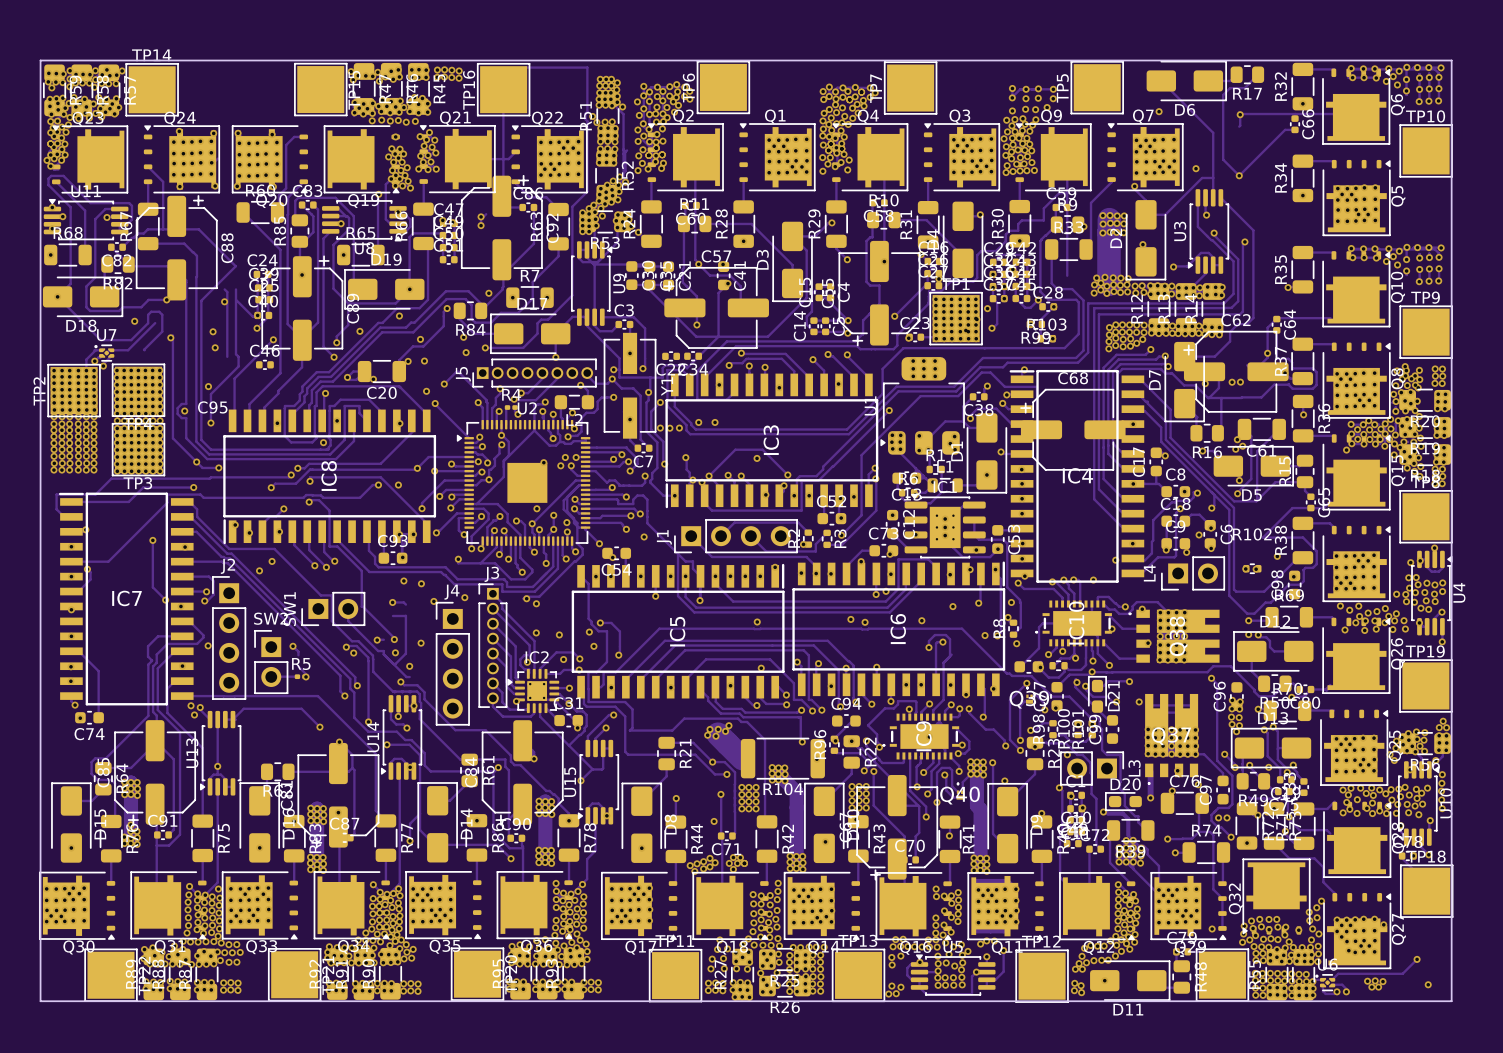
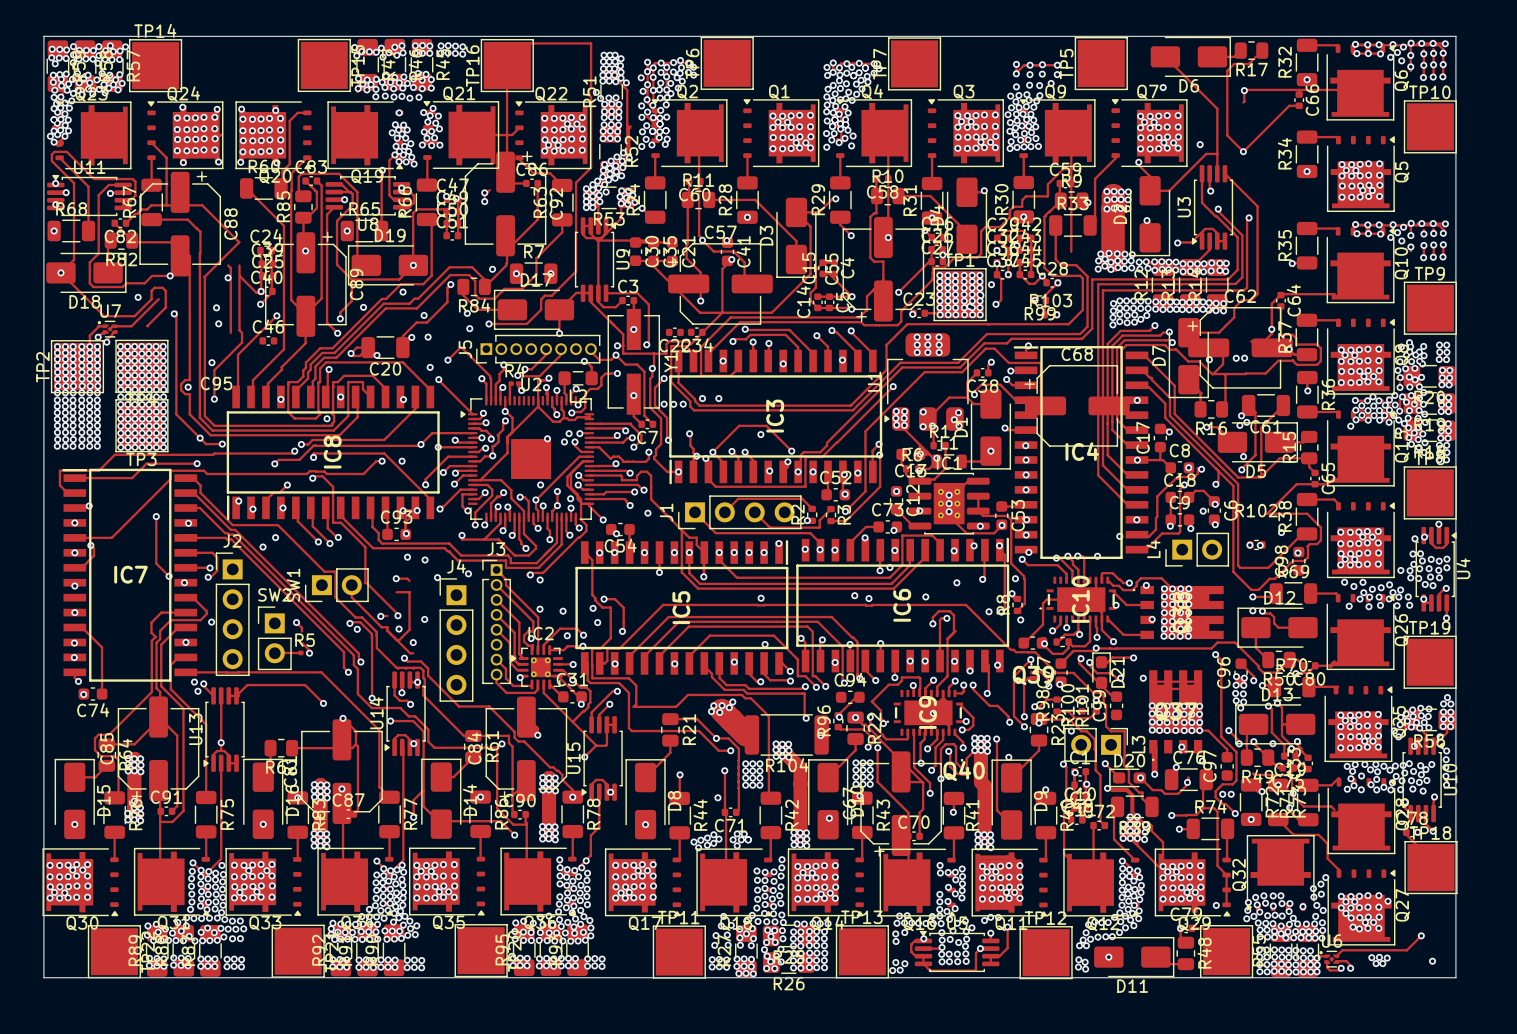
track: none -> (1241, 663) (1253, 676) (1253, 680)
via: none -> (1253, 680)
track: none -> (1105, 763) (1119, 777)
via: none -> (1105, 763)
via: none -> (1140, 777)
track: none -> (1188, 777) (1188, 783) (1178, 793) (1165, 793) (1161, 790) (1152, 790) (1139, 777)
via: none -> (1187, 782)

